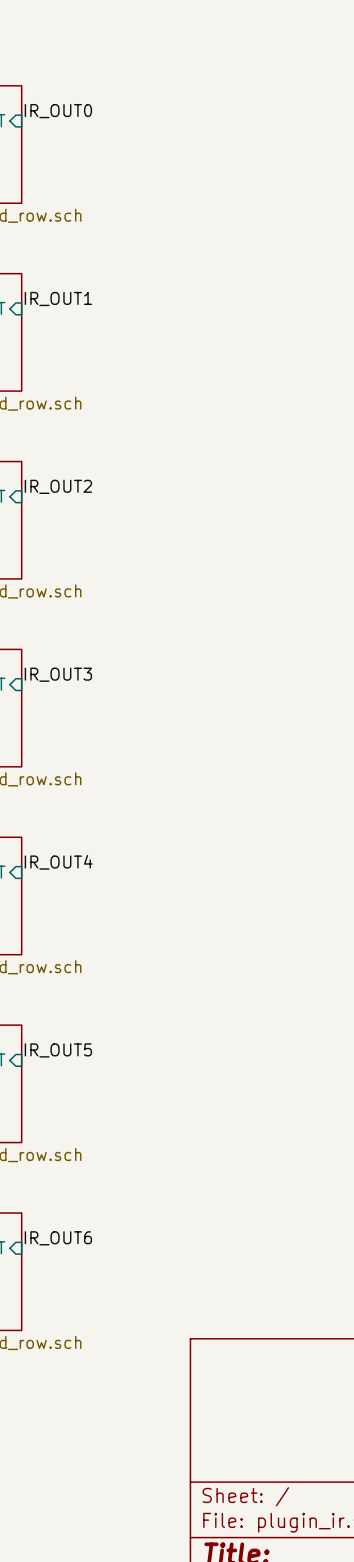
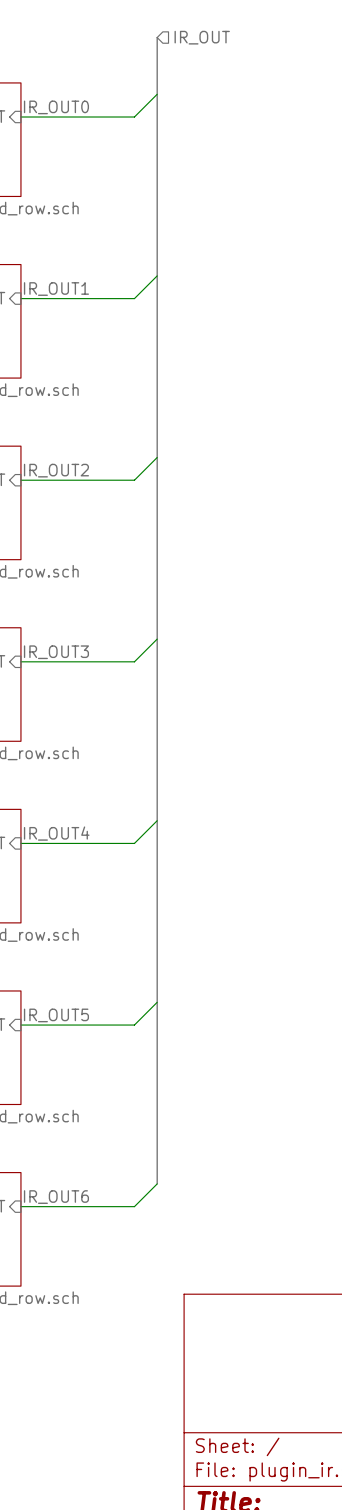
bus: none -> (157, 37) (157, 1183)
hierarchical label: none -> IR_OUT (202, 37)
wire: none -> (157, 94) (134, 117) (20, 117)
wire: none -> (157, 275) (134, 298) (20, 298)
wire: none -> (157, 457) (134, 480) (20, 480)
wire: none -> (157, 639) (134, 661) (20, 661)
wire: none -> (157, 820) (134, 843) (20, 843)
wire: none -> (157, 1002) (134, 1025) (20, 1025)
wire: none -> (157, 1183) (134, 1206) (20, 1206)

